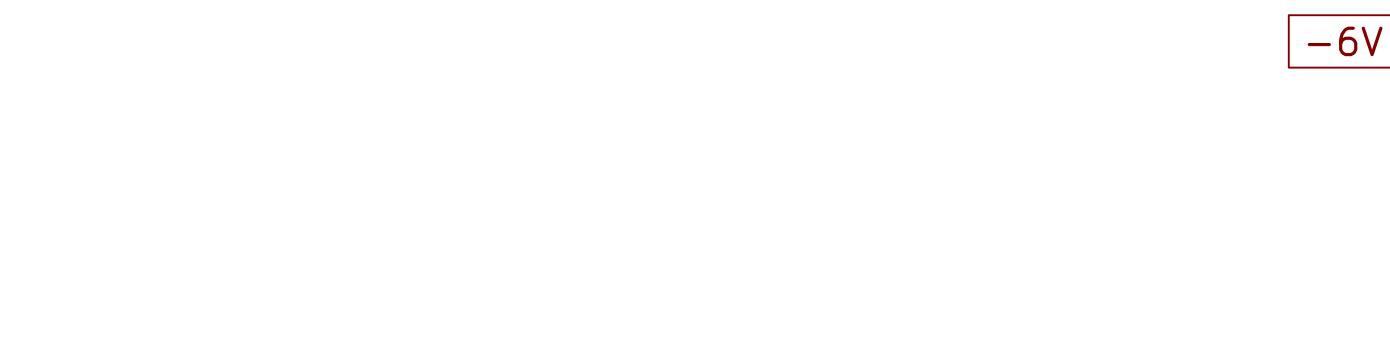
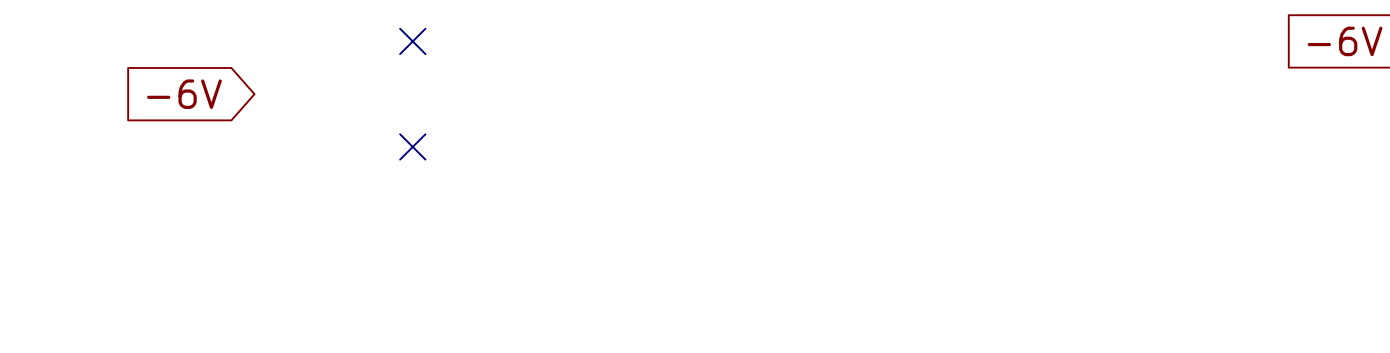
no-connect mark: none -> (412, 41)
global label: none -> -6V (184, 94)
no-connect mark: none -> (412, 146)

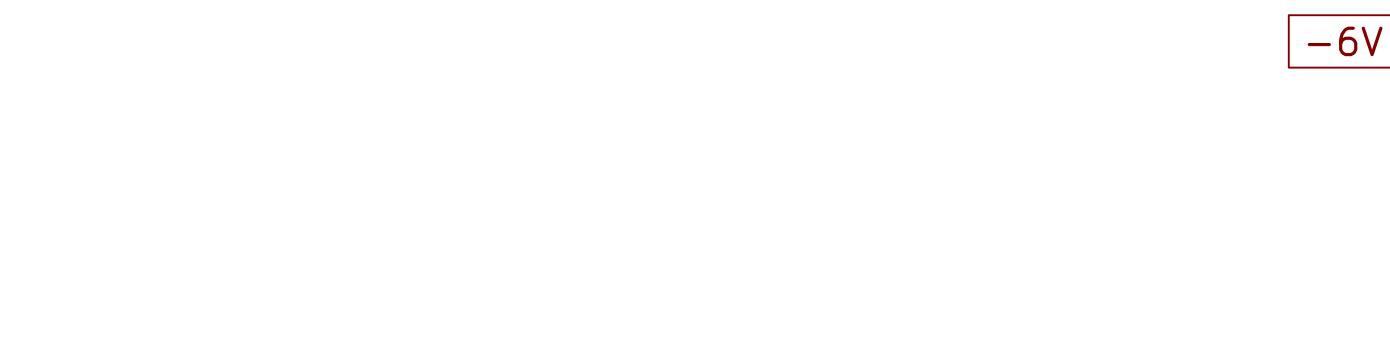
no-connect mark: (412, 41) -> none
global label: -6V (184, 94) -> none
no-connect mark: (412, 146) -> none

